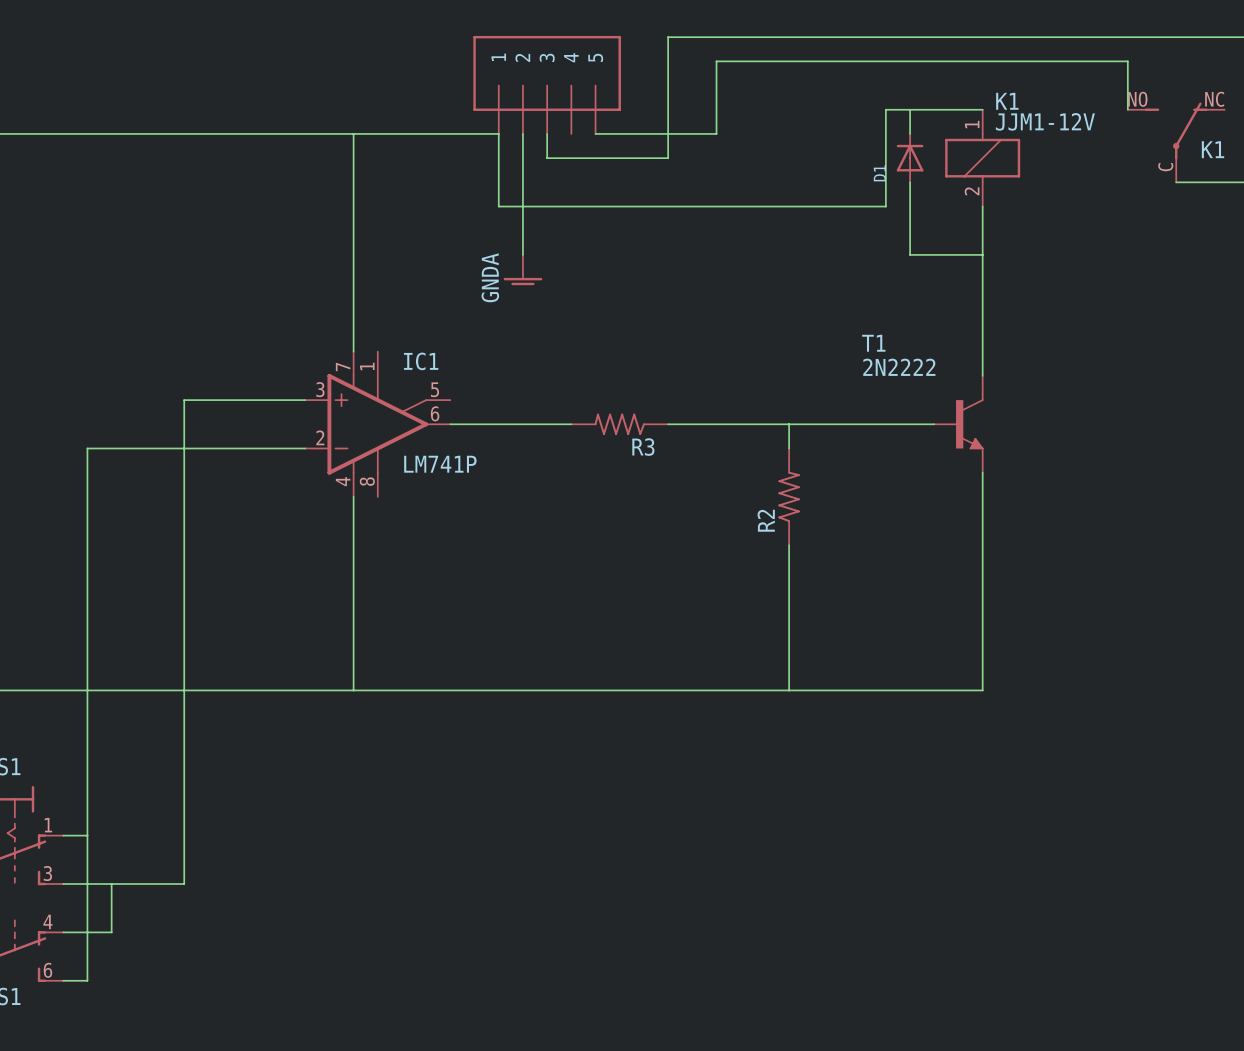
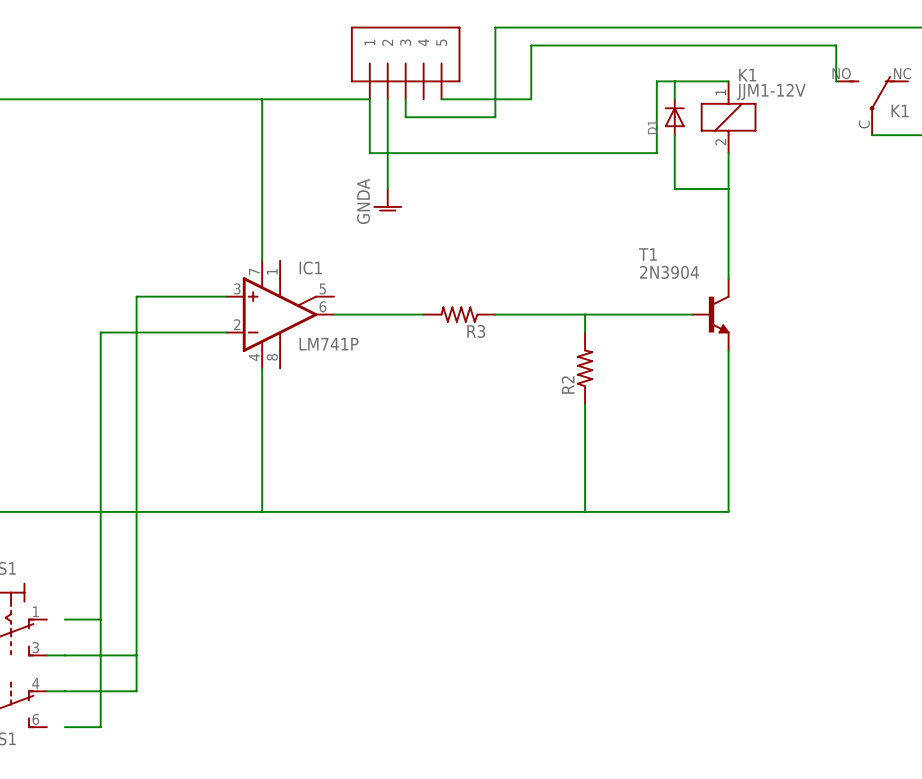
T1 value: 2N2222 (899, 367) -> 2N3904 (669, 272)
wire: (135, 448) (87, 448) (87, 980) (63, 980) -> (100, 332) (100, 727) (64, 727)
wire: (63, 835) (87, 835) -> (100, 619) (64, 619)
wire: (111, 884) (111, 932) -> (136, 655) (136, 691) (82, 691)

